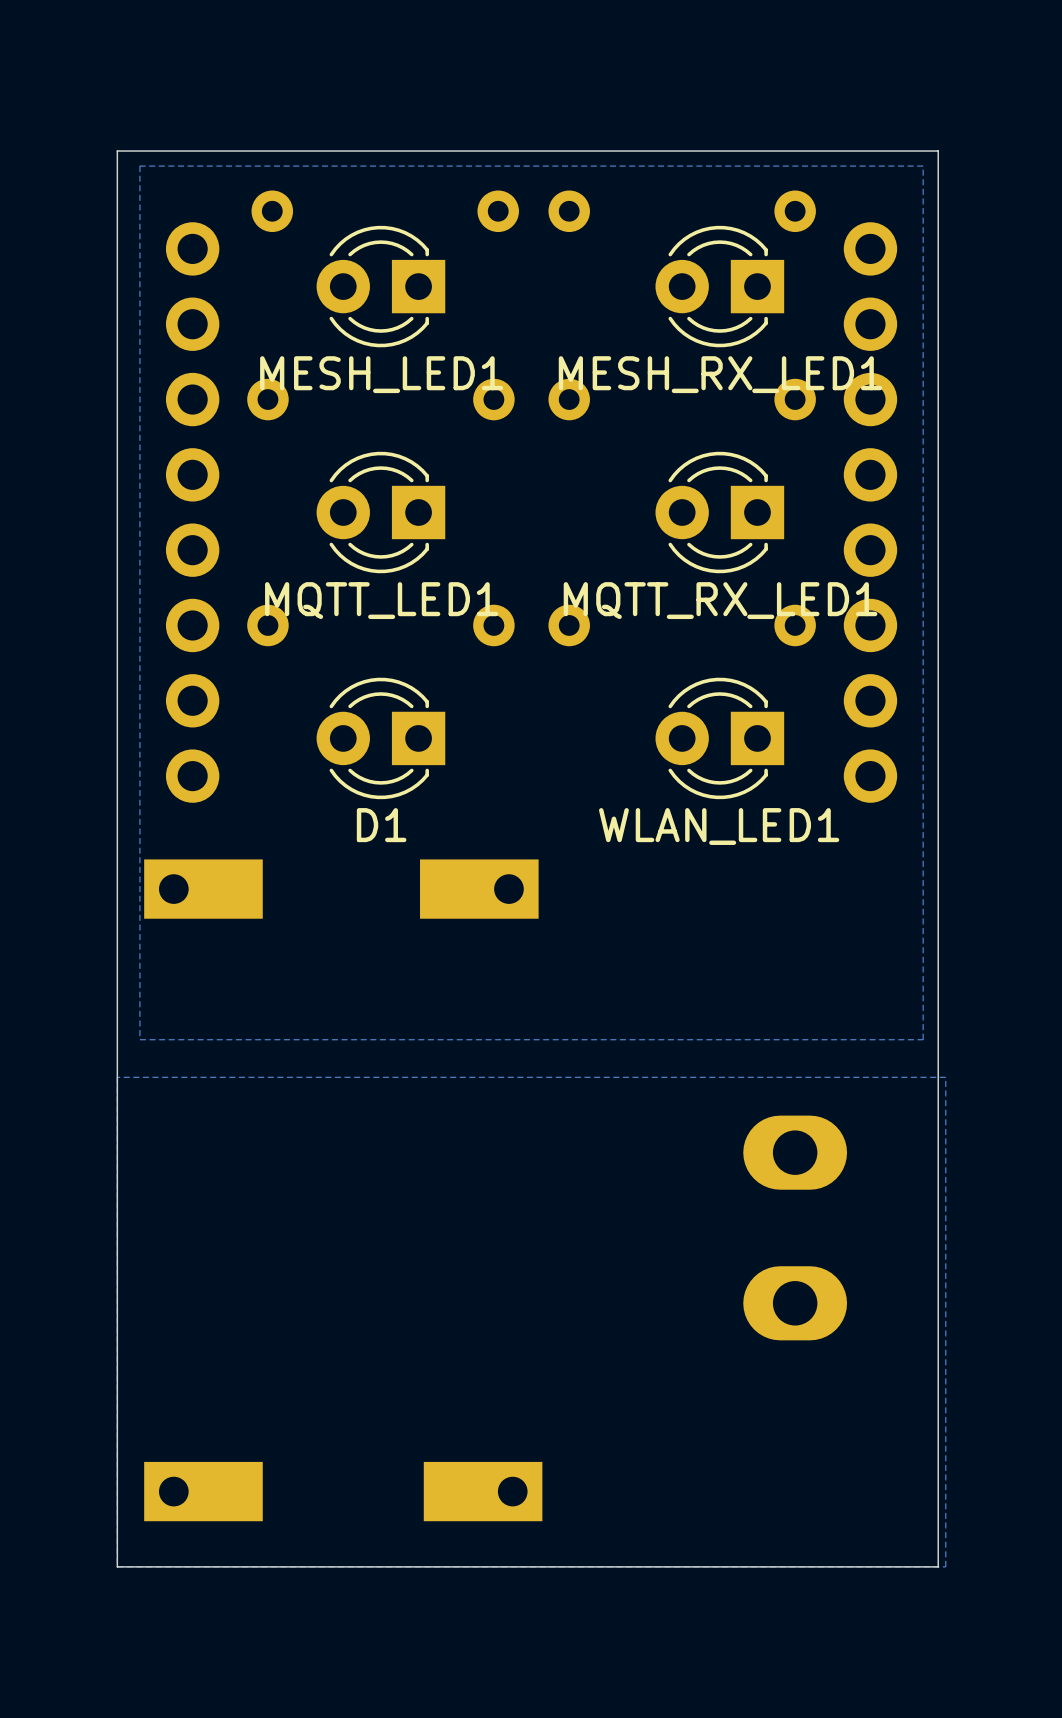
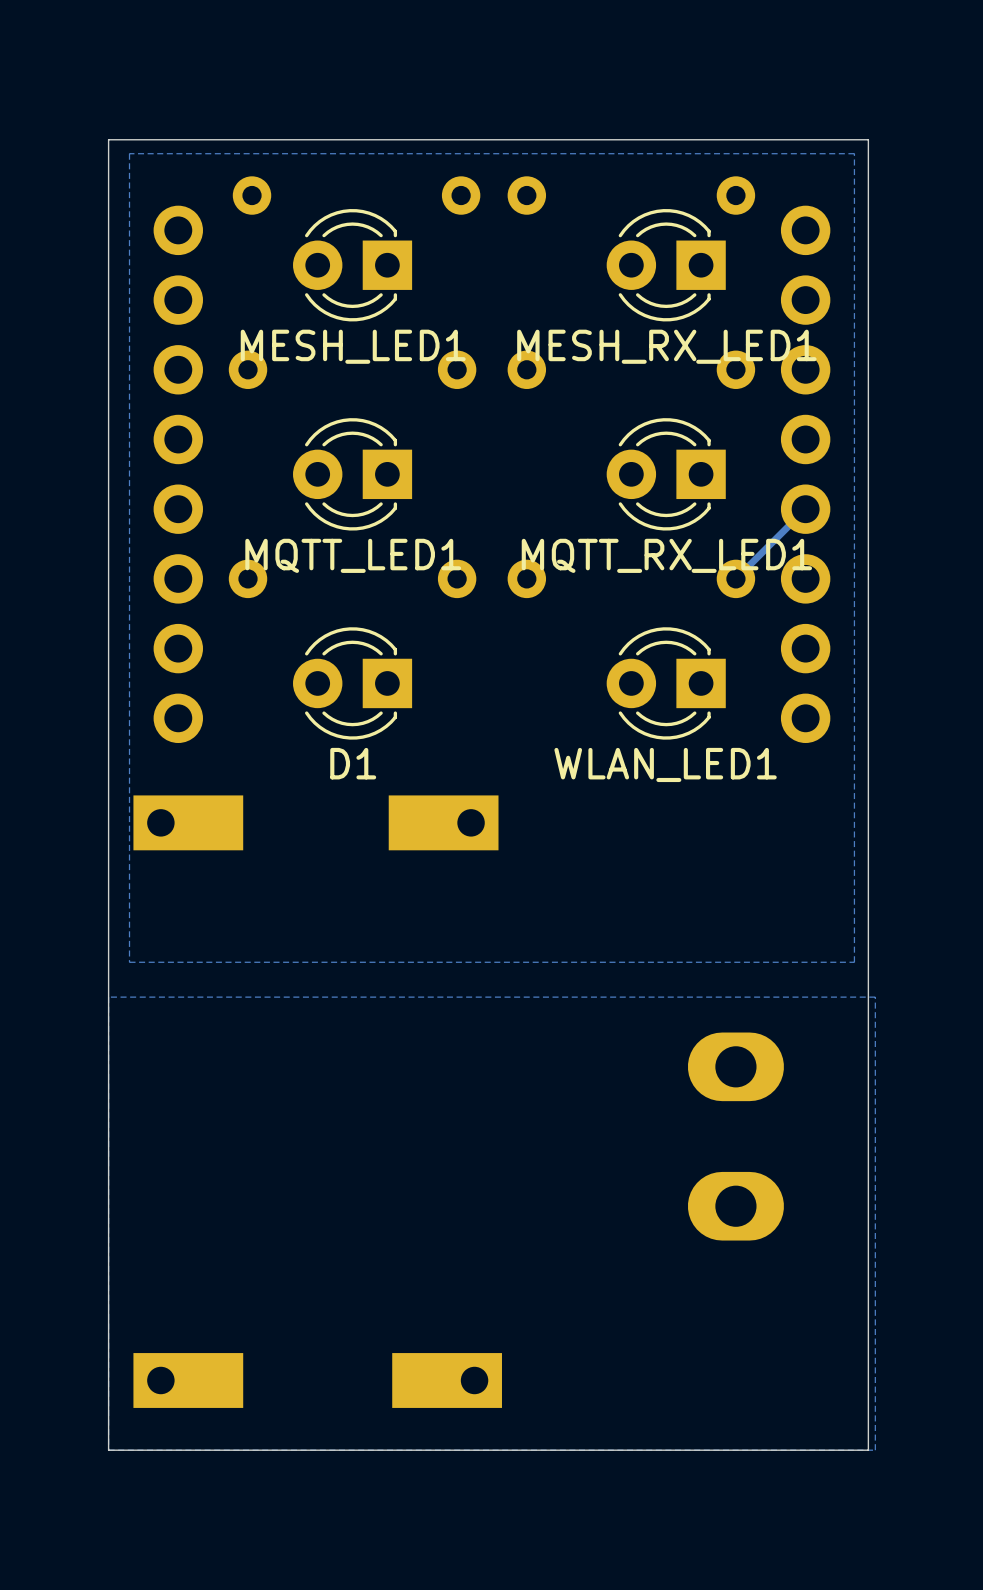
track: none -> (805, 509) (735, 578)

